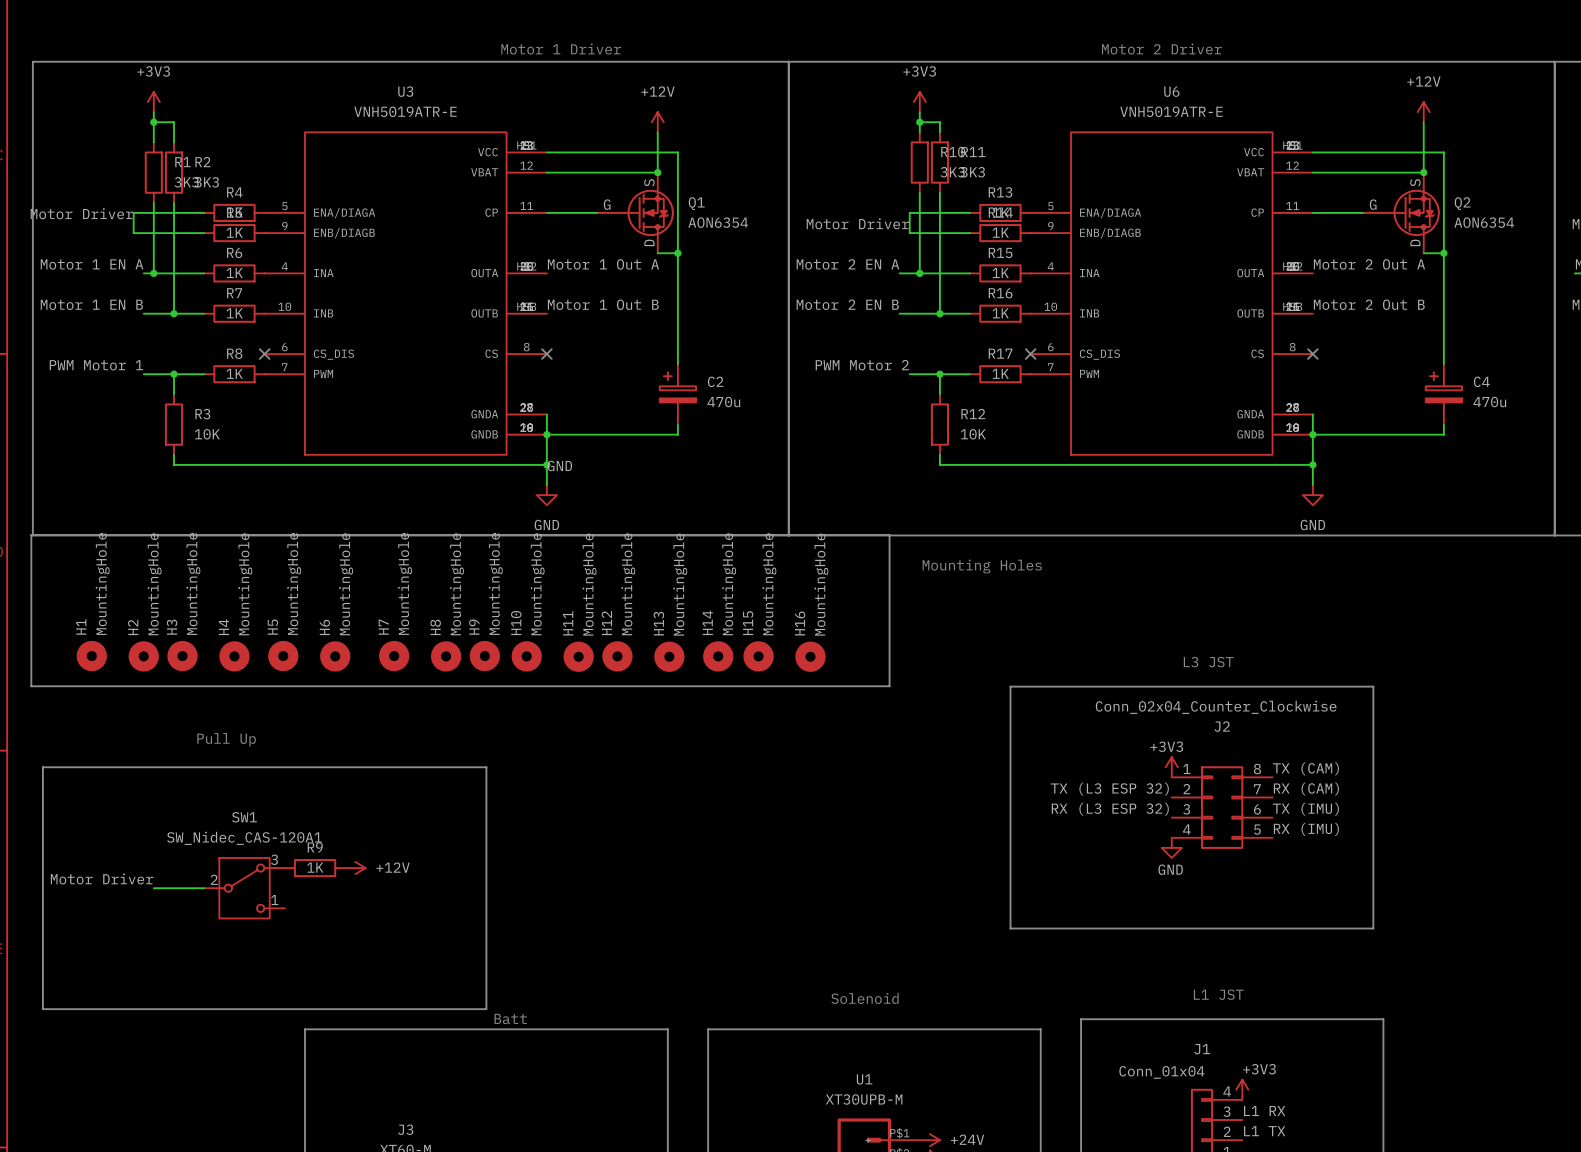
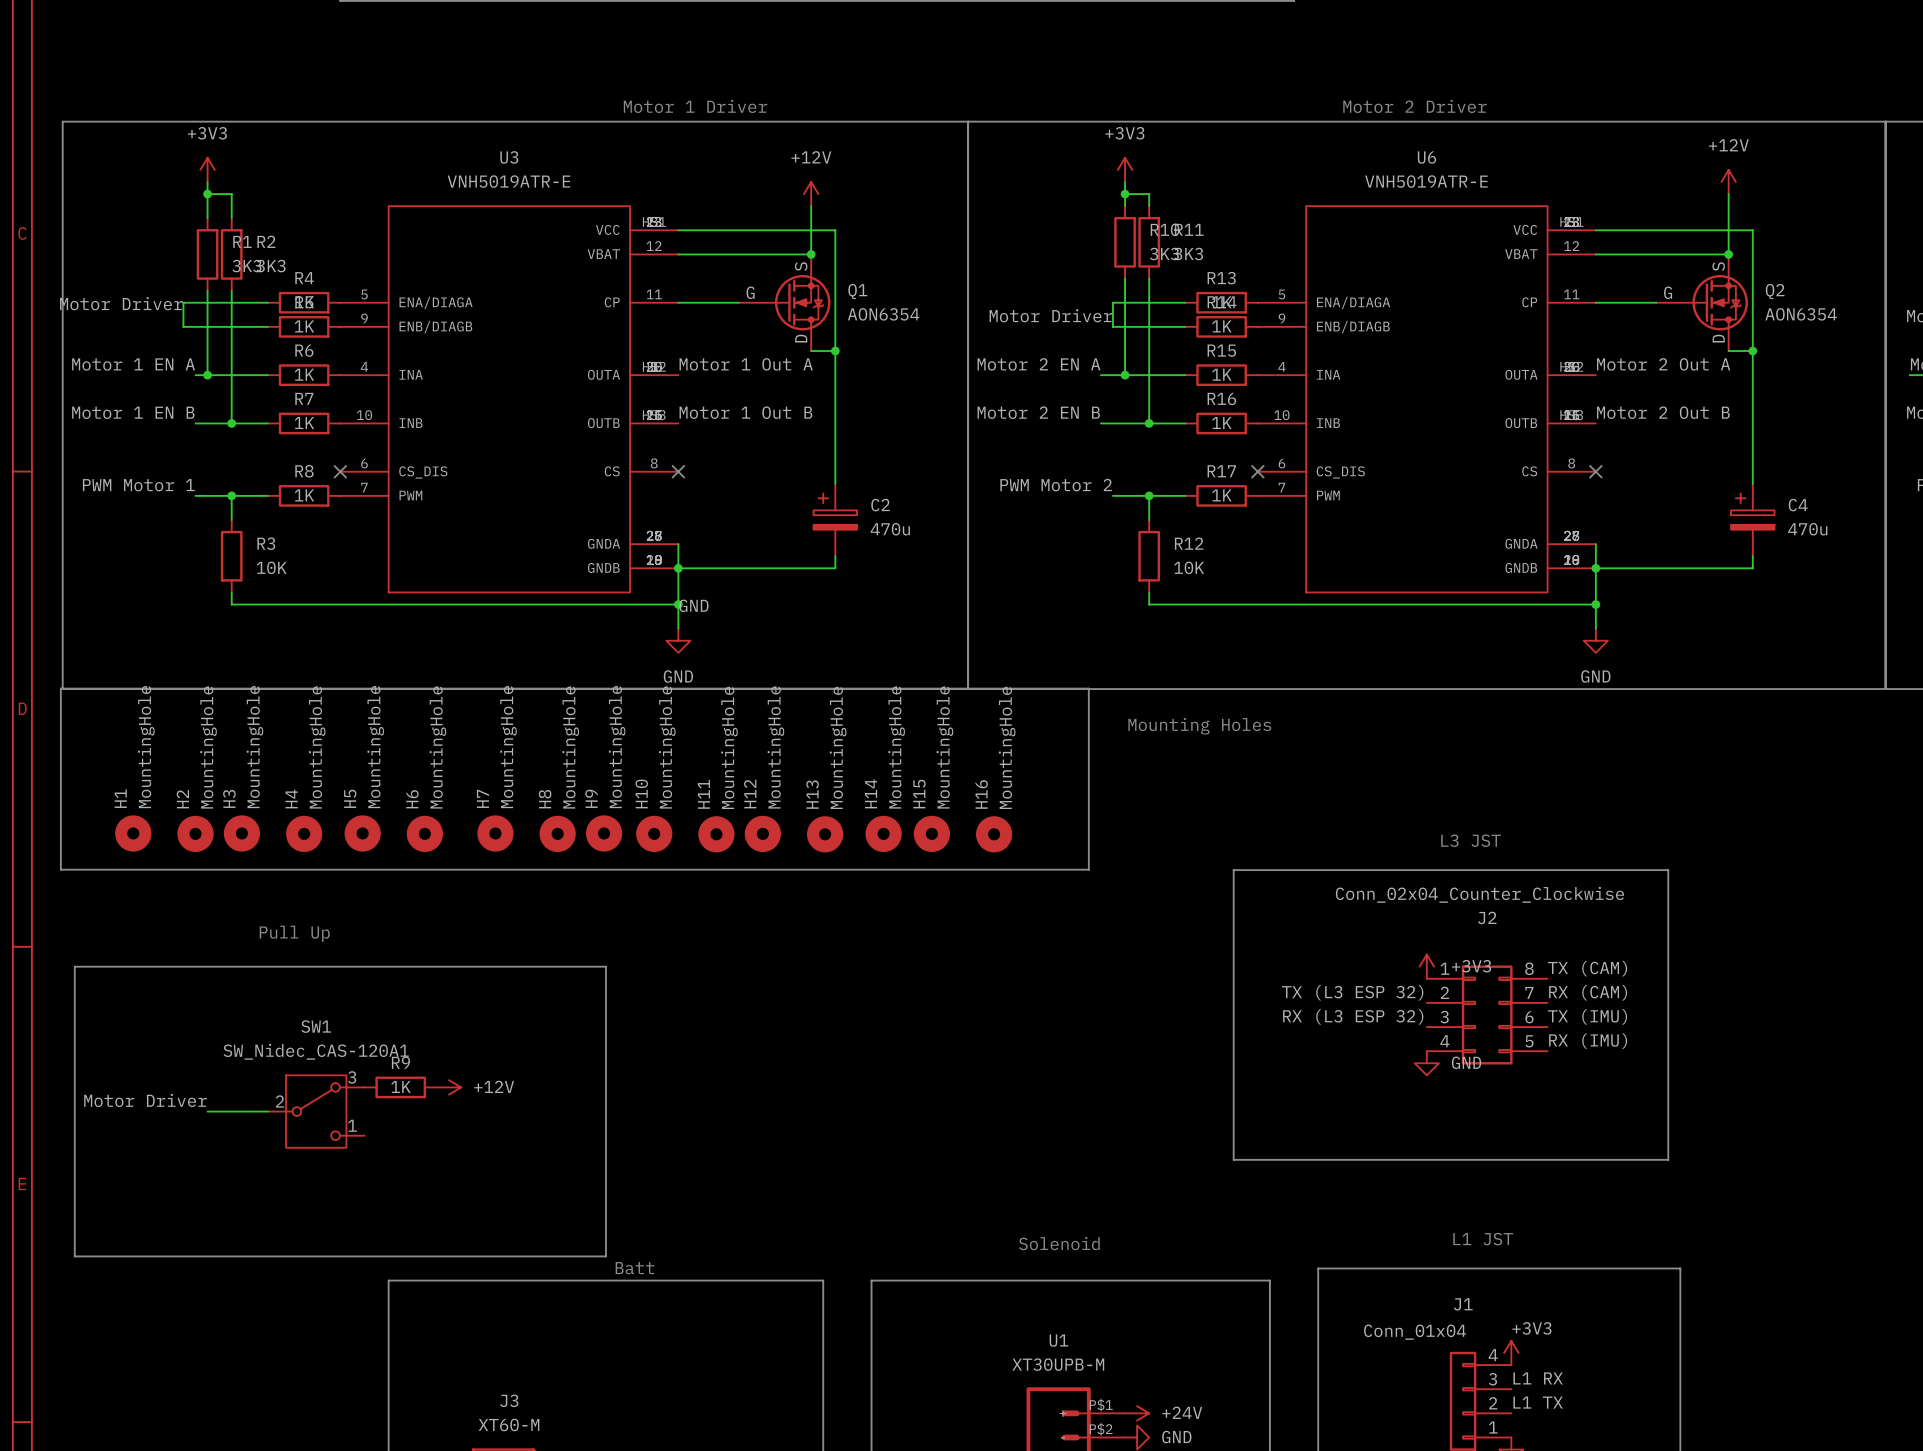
power symbol text position: +3V3 (1166, 746) -> +3V3 (1471, 966)
power symbol text position: GND (1170, 869) -> GND (1466, 1062)

